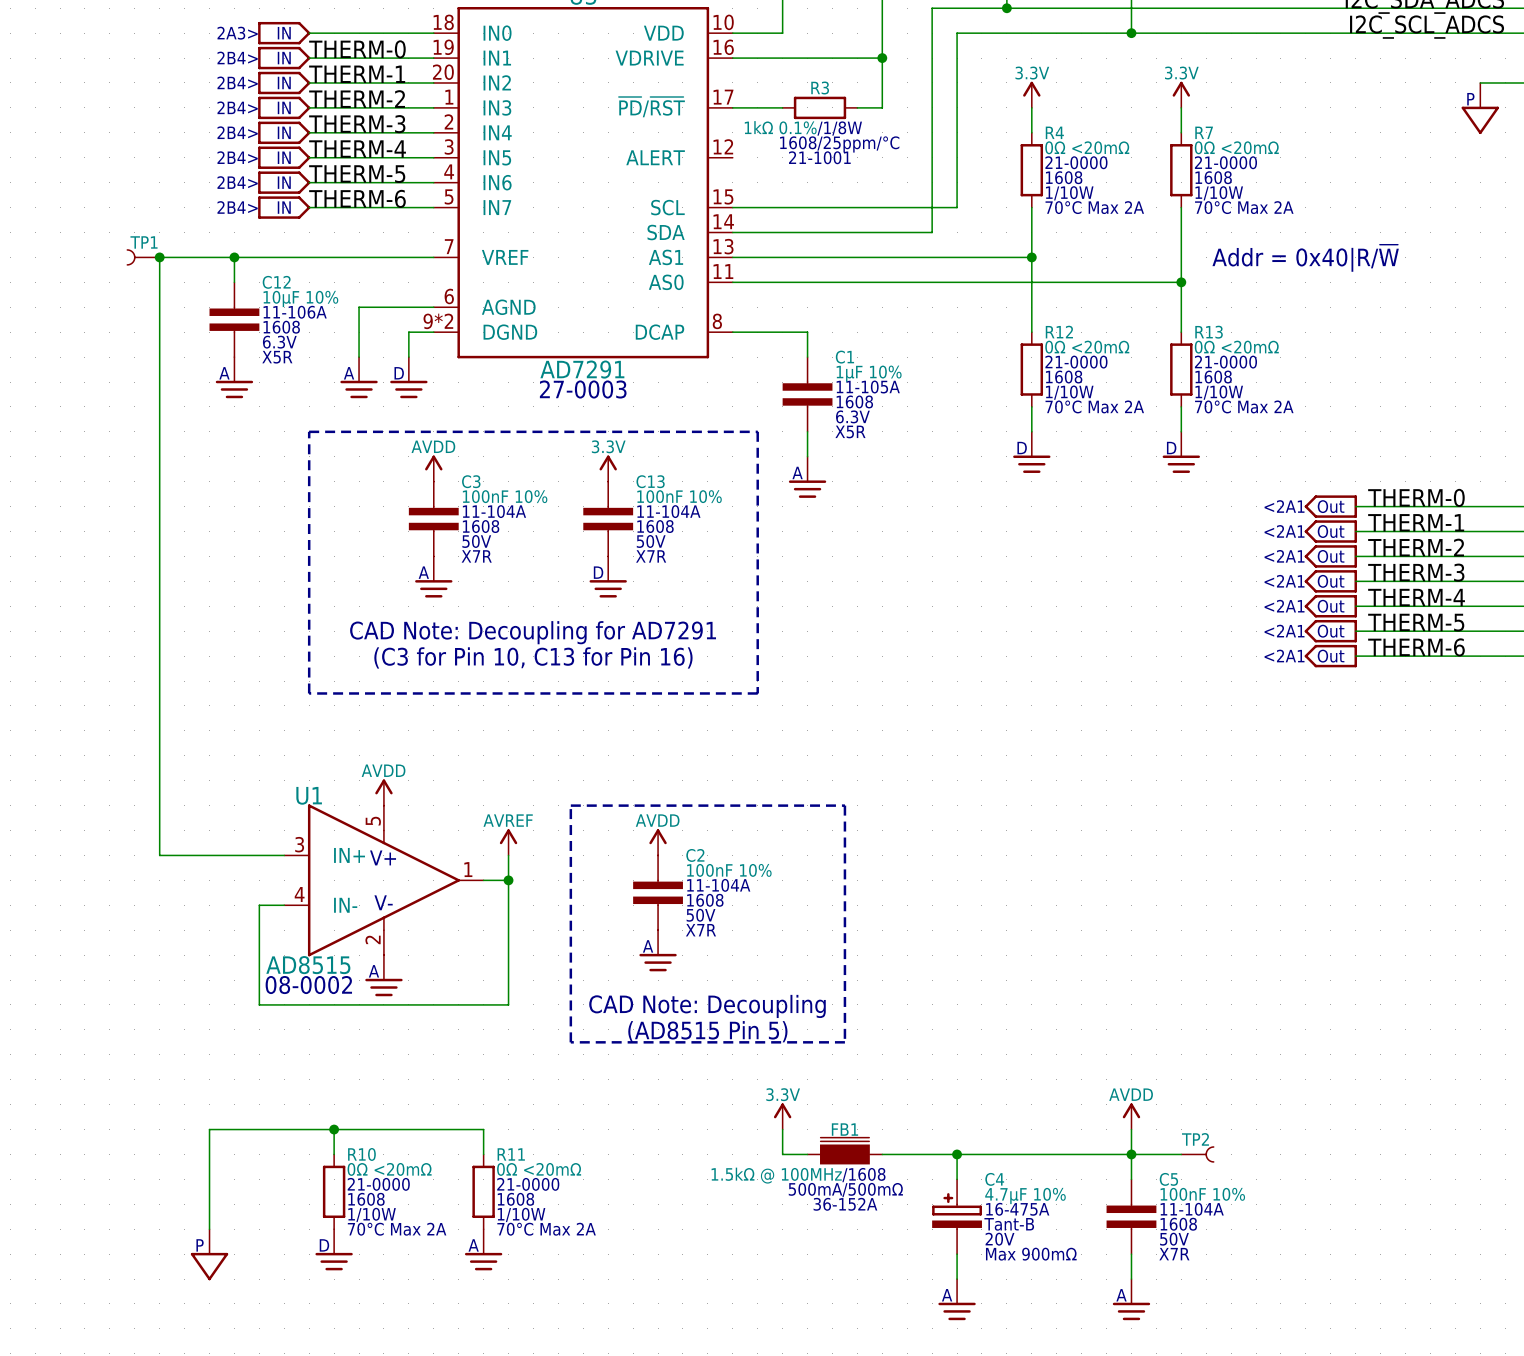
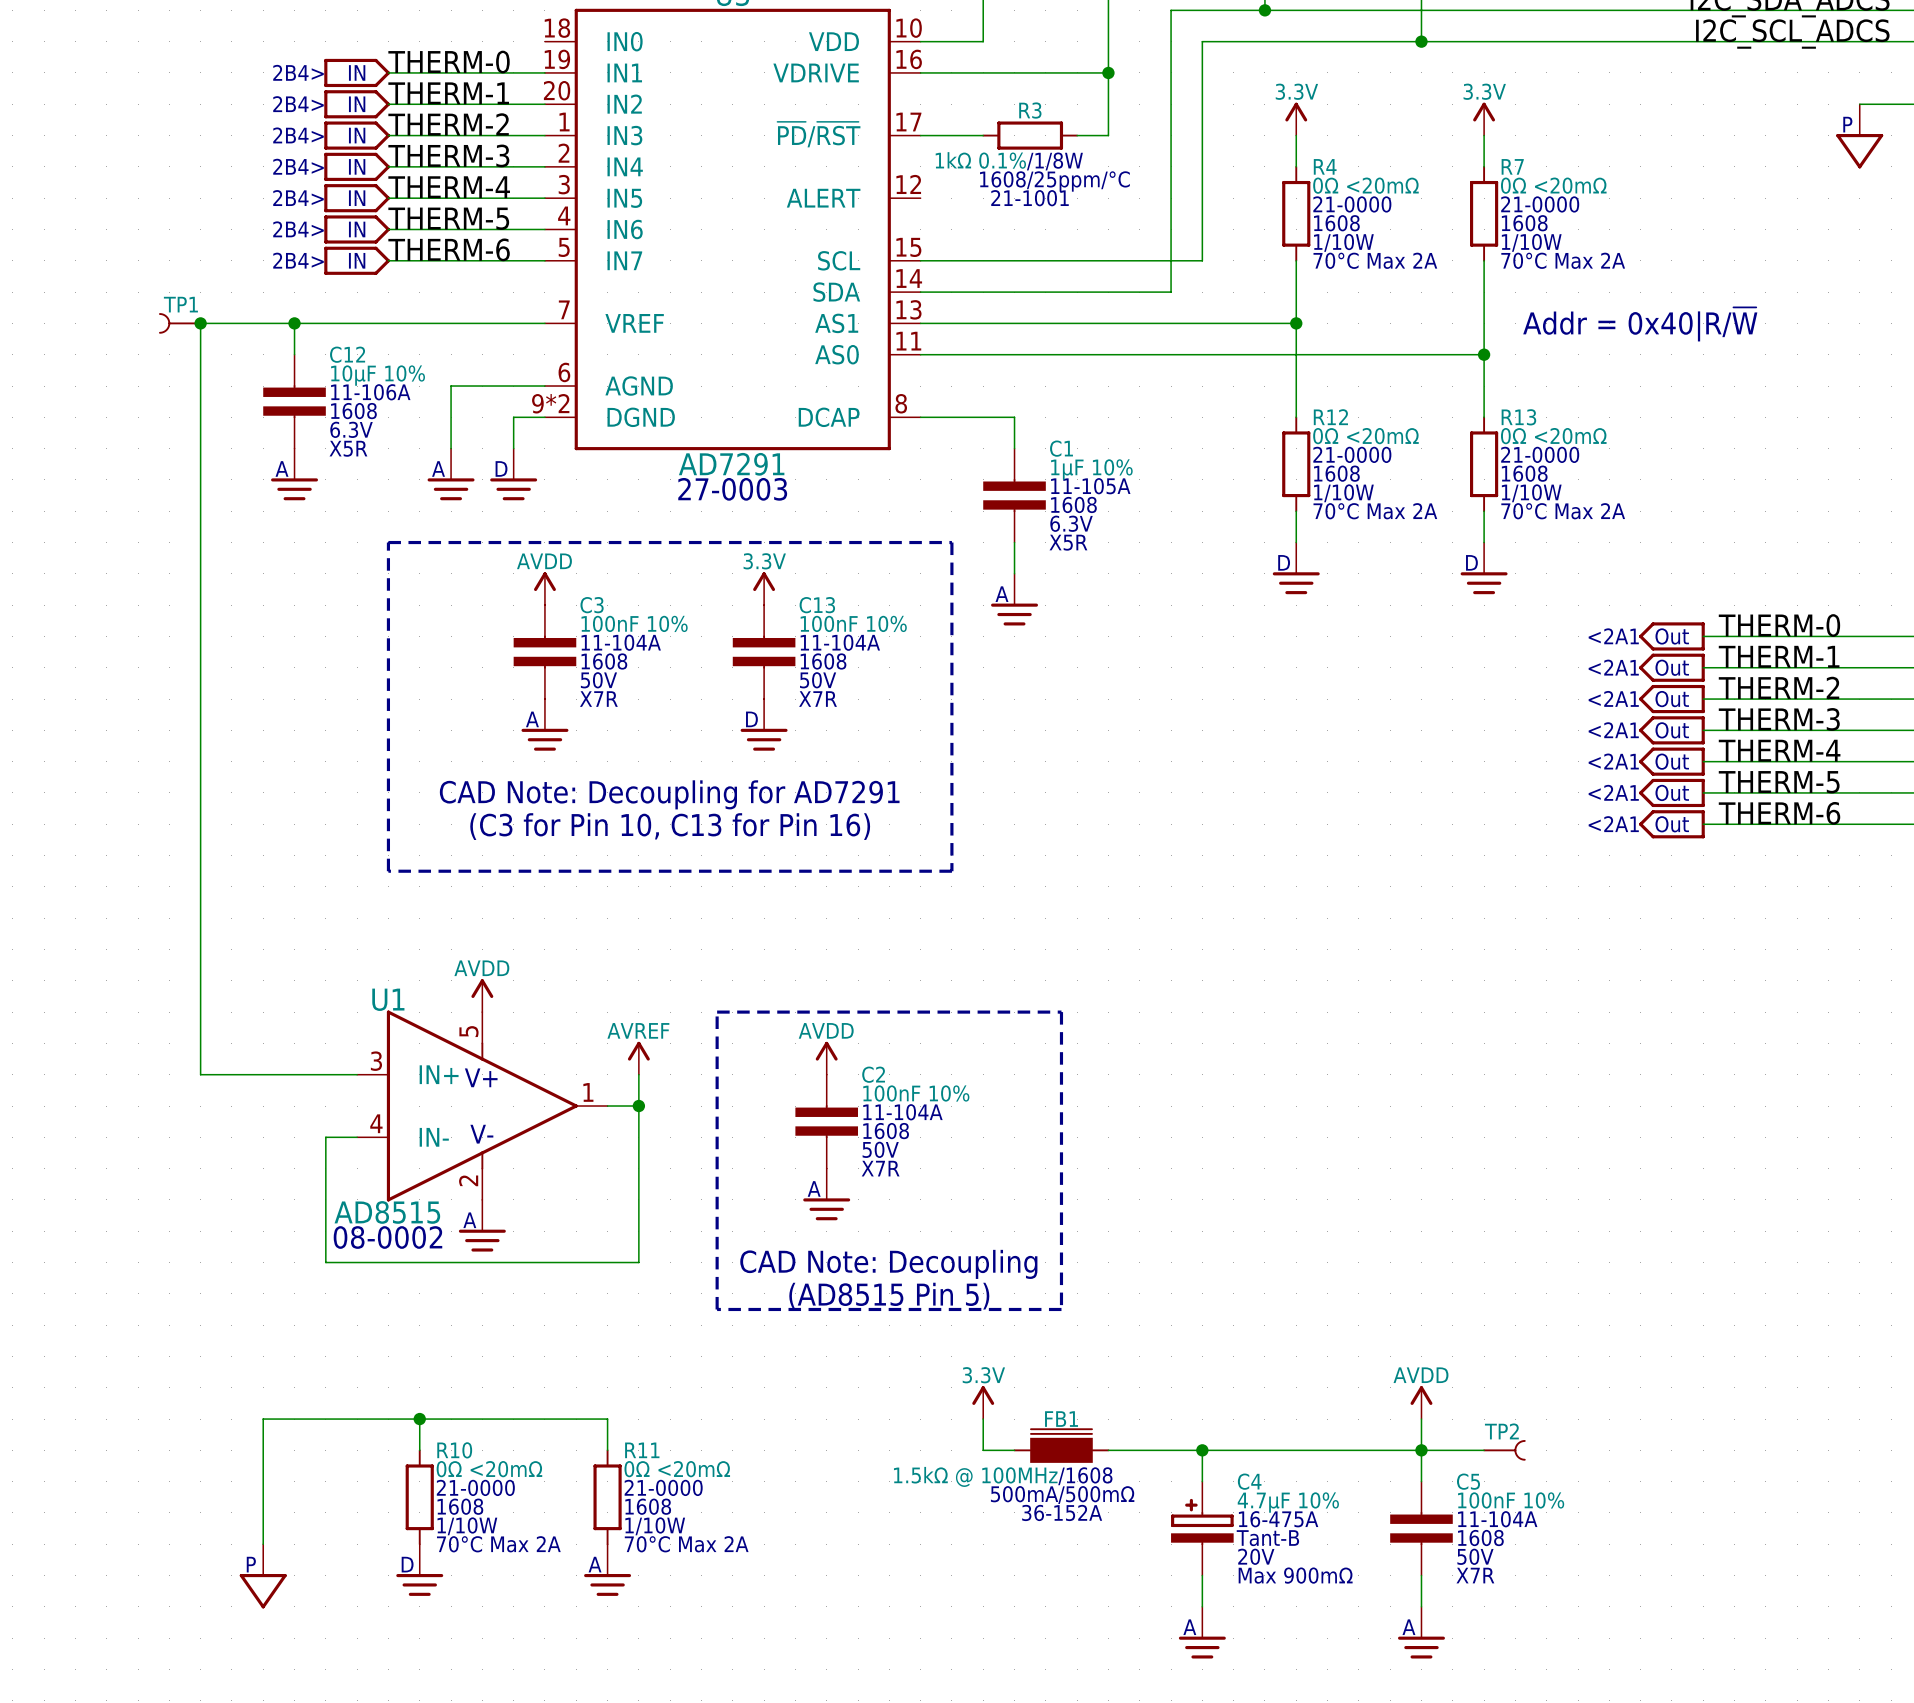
text: 2A3> (237, 33) -> none
part: (284, 33) -> none
wire: (309, 33) (433, 33) -> none

